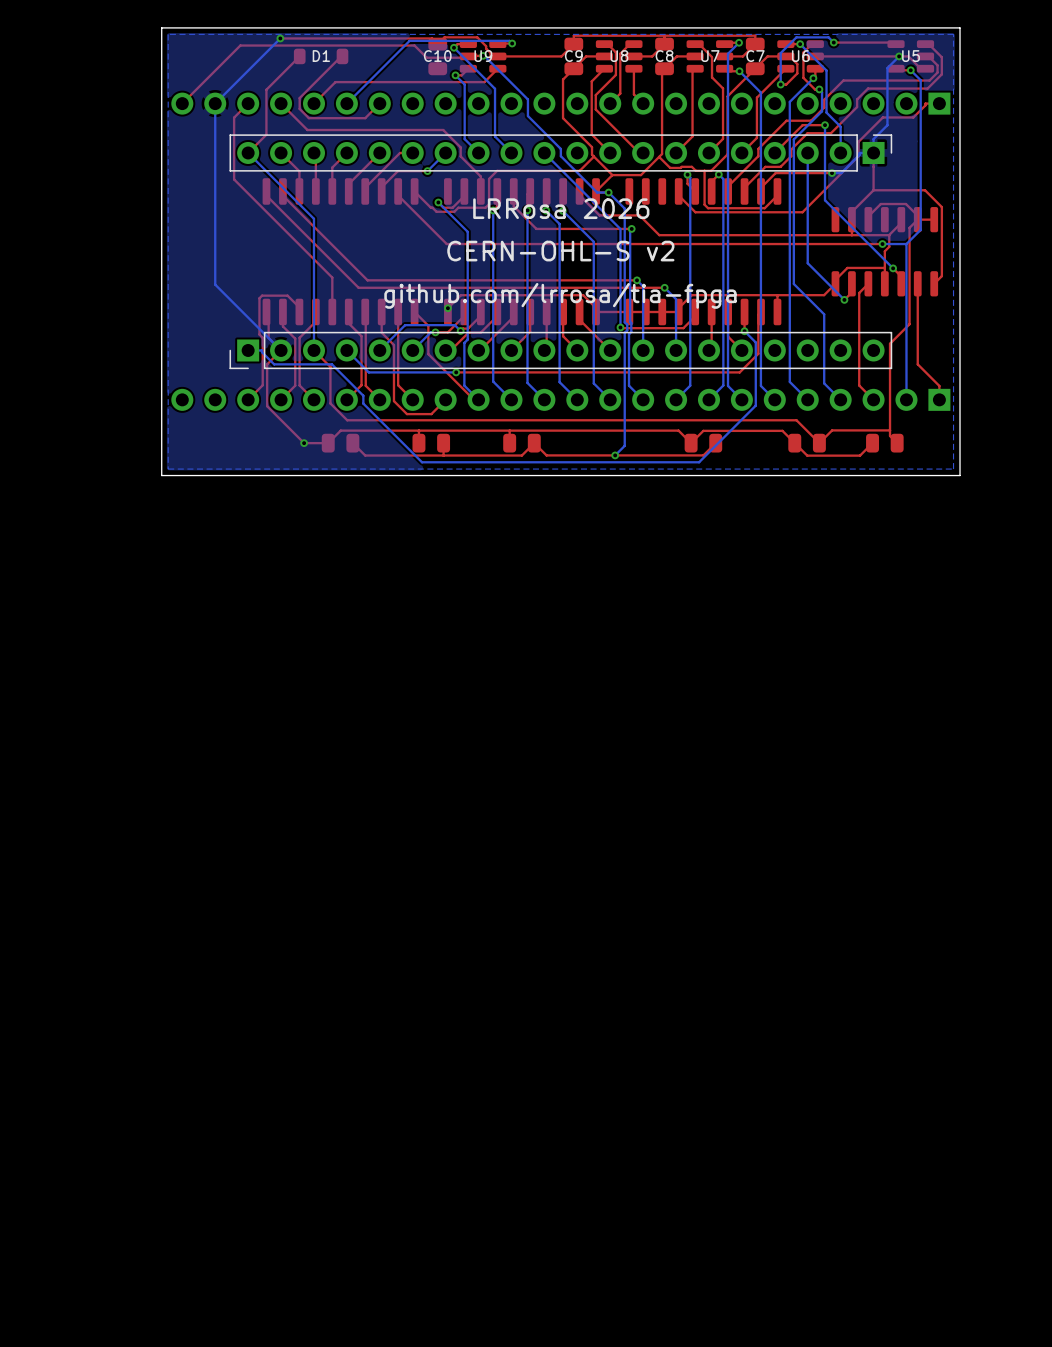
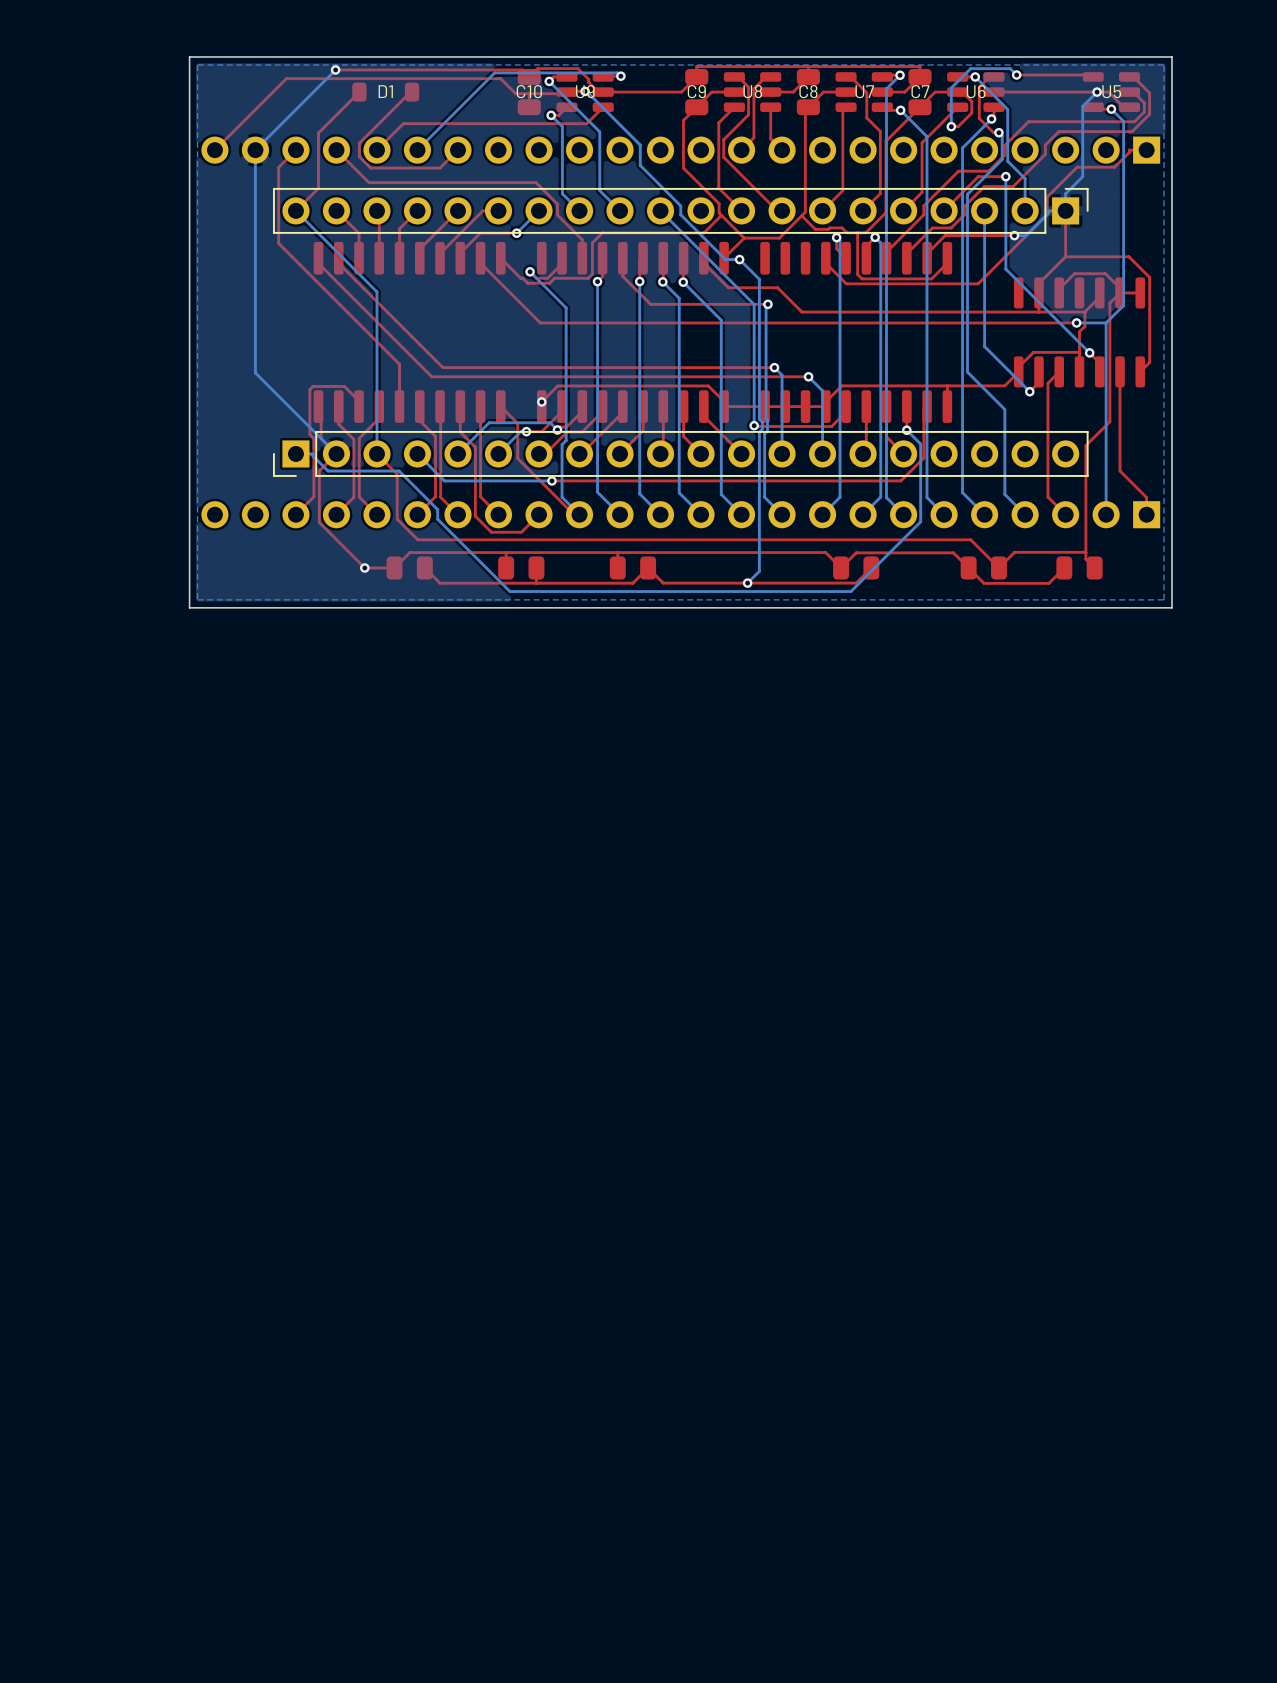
text: LRRosa 2026 (561, 208) -> none
text: CERN-OHL-S v2 (560, 251) -> none
text: github.com/lrrosa/tia-fpga (560, 295) -> none

